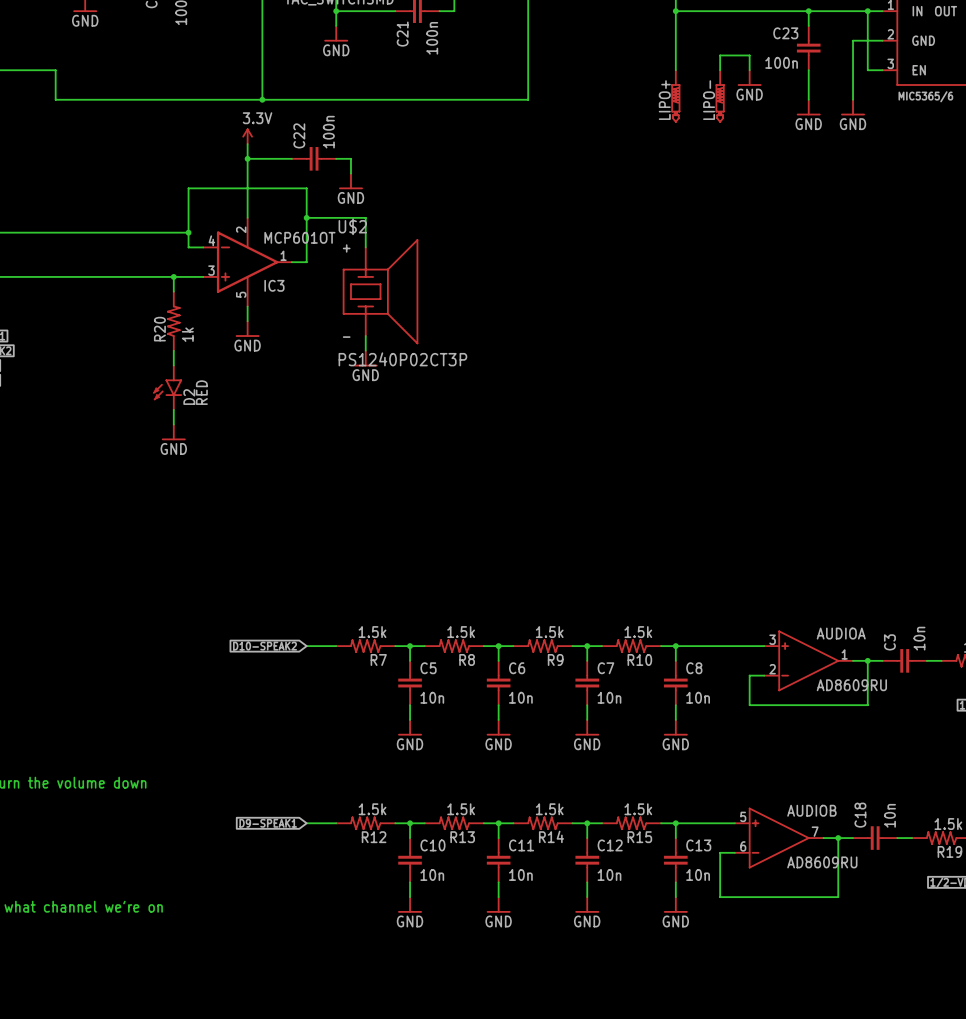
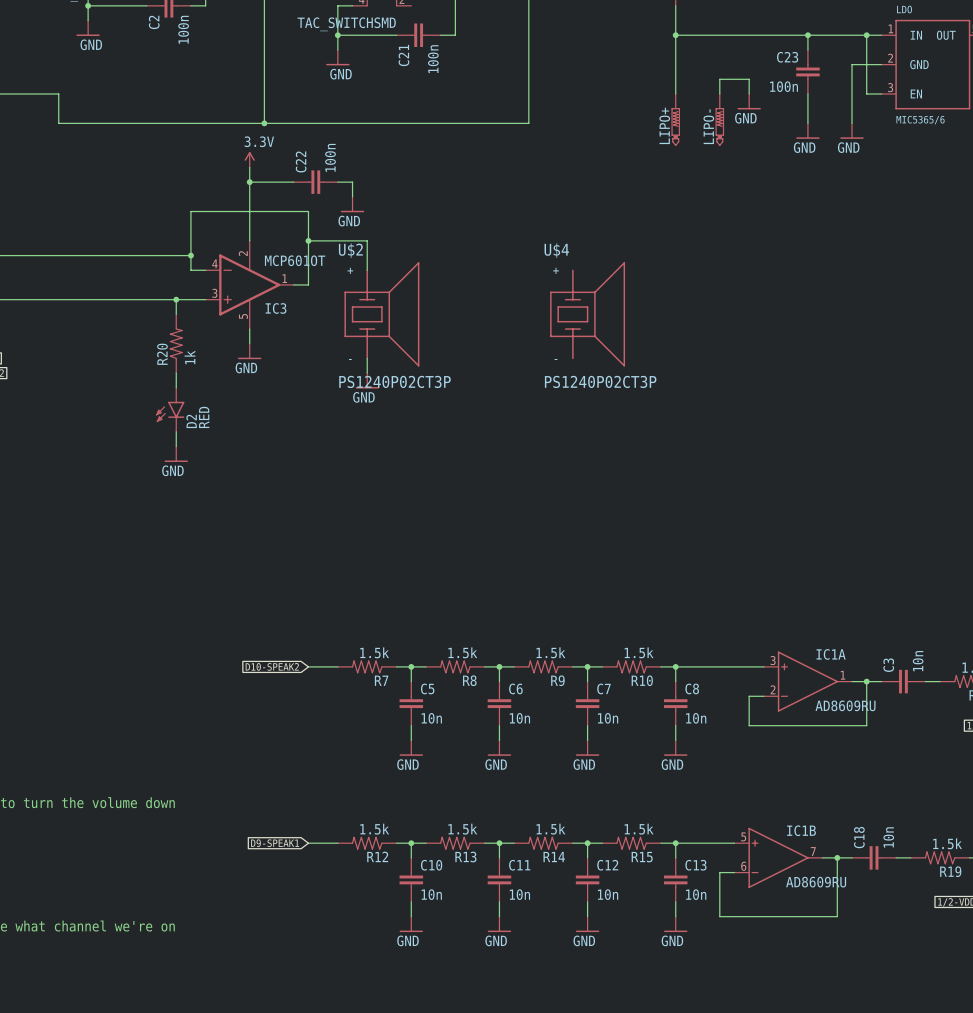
U$4: none -> PS1240P02CT3P (587, 314)
AUDIOA name: AUDIOA (841, 633) -> IC1A (831, 654)
AUDIOB name: AUDIOB (811, 810) -> IC1B (801, 830)

